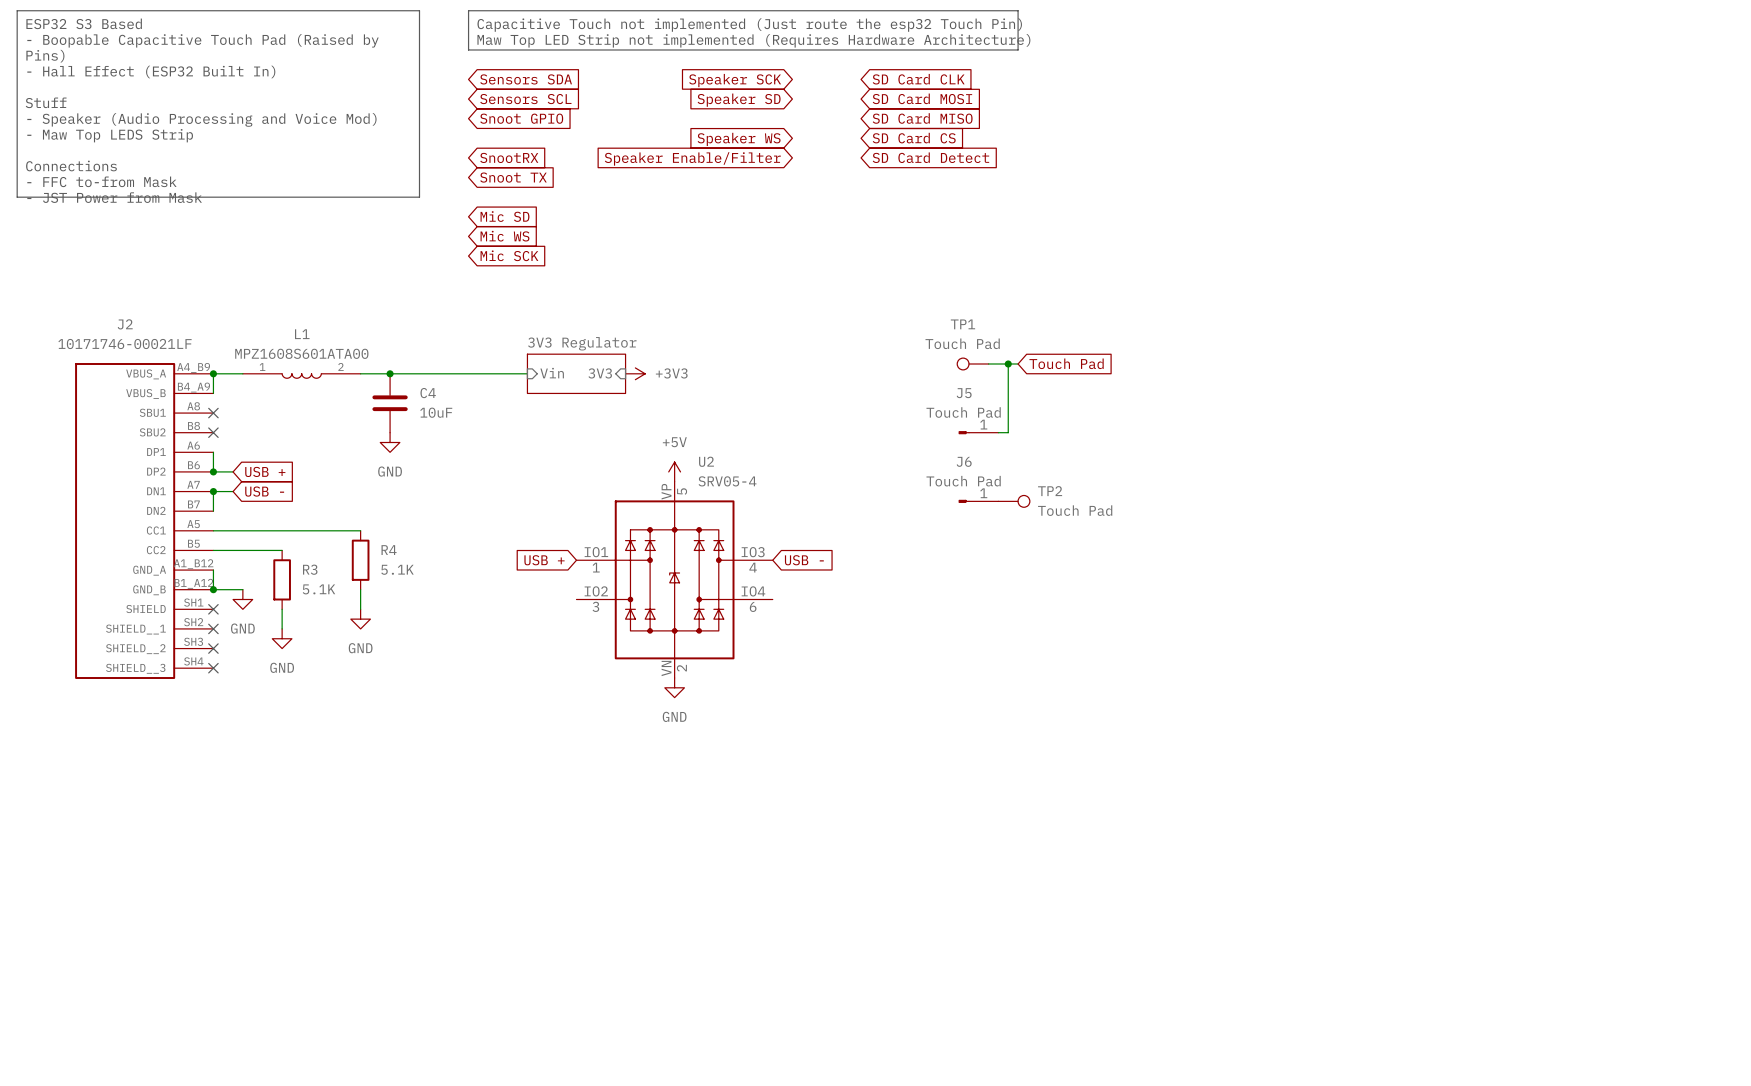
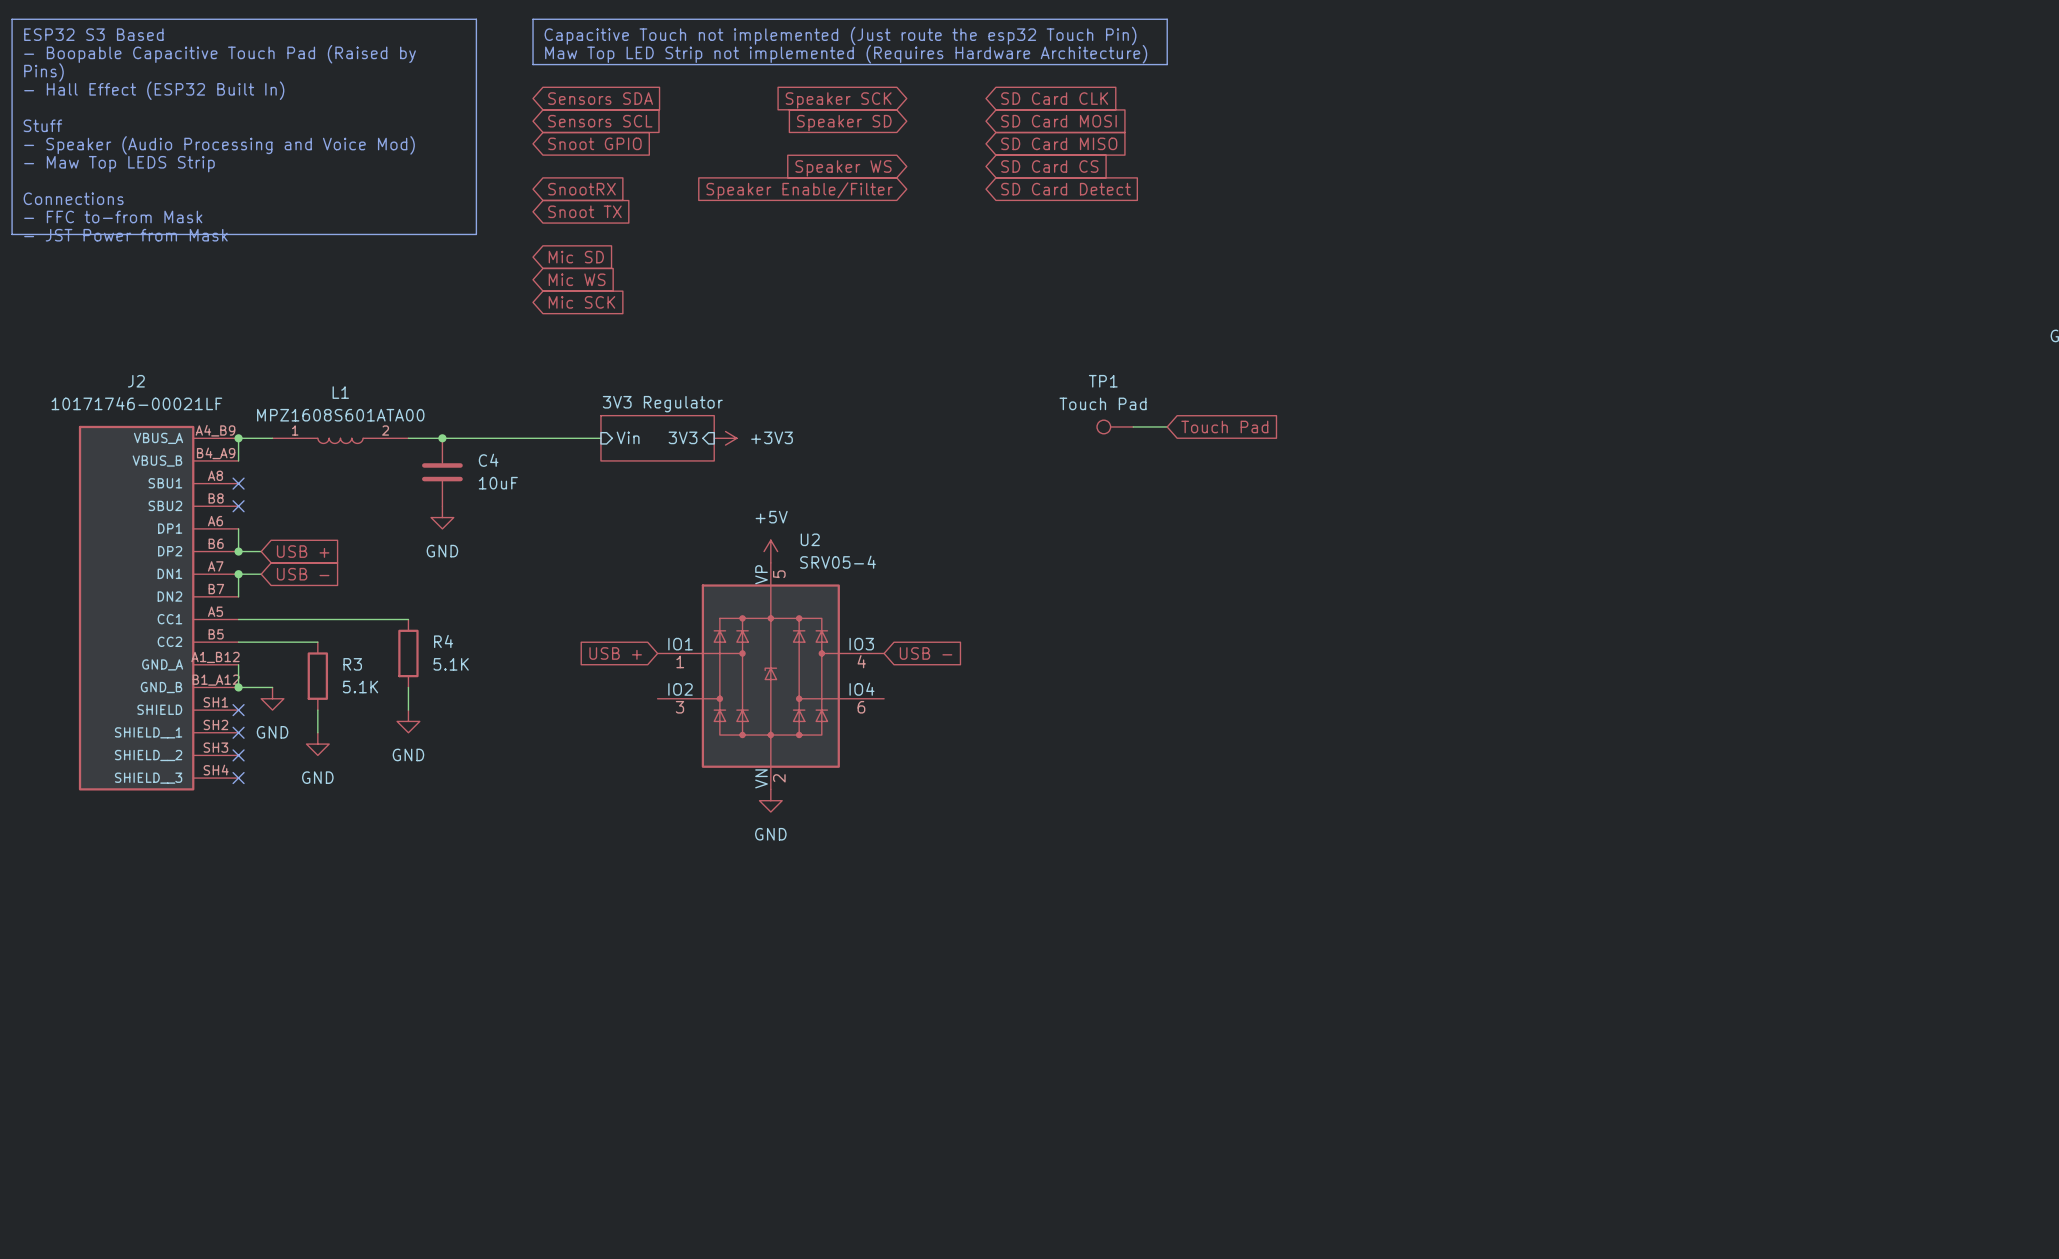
wire: (1008, 363) (1008, 432) (998, 432) -> none
junction: (1008, 363) -> none
J5: Touch Pad (978, 432) -> none
J6: Touch Pad (978, 501) -> none
TP2: Touch Pad (1014, 501) -> none

